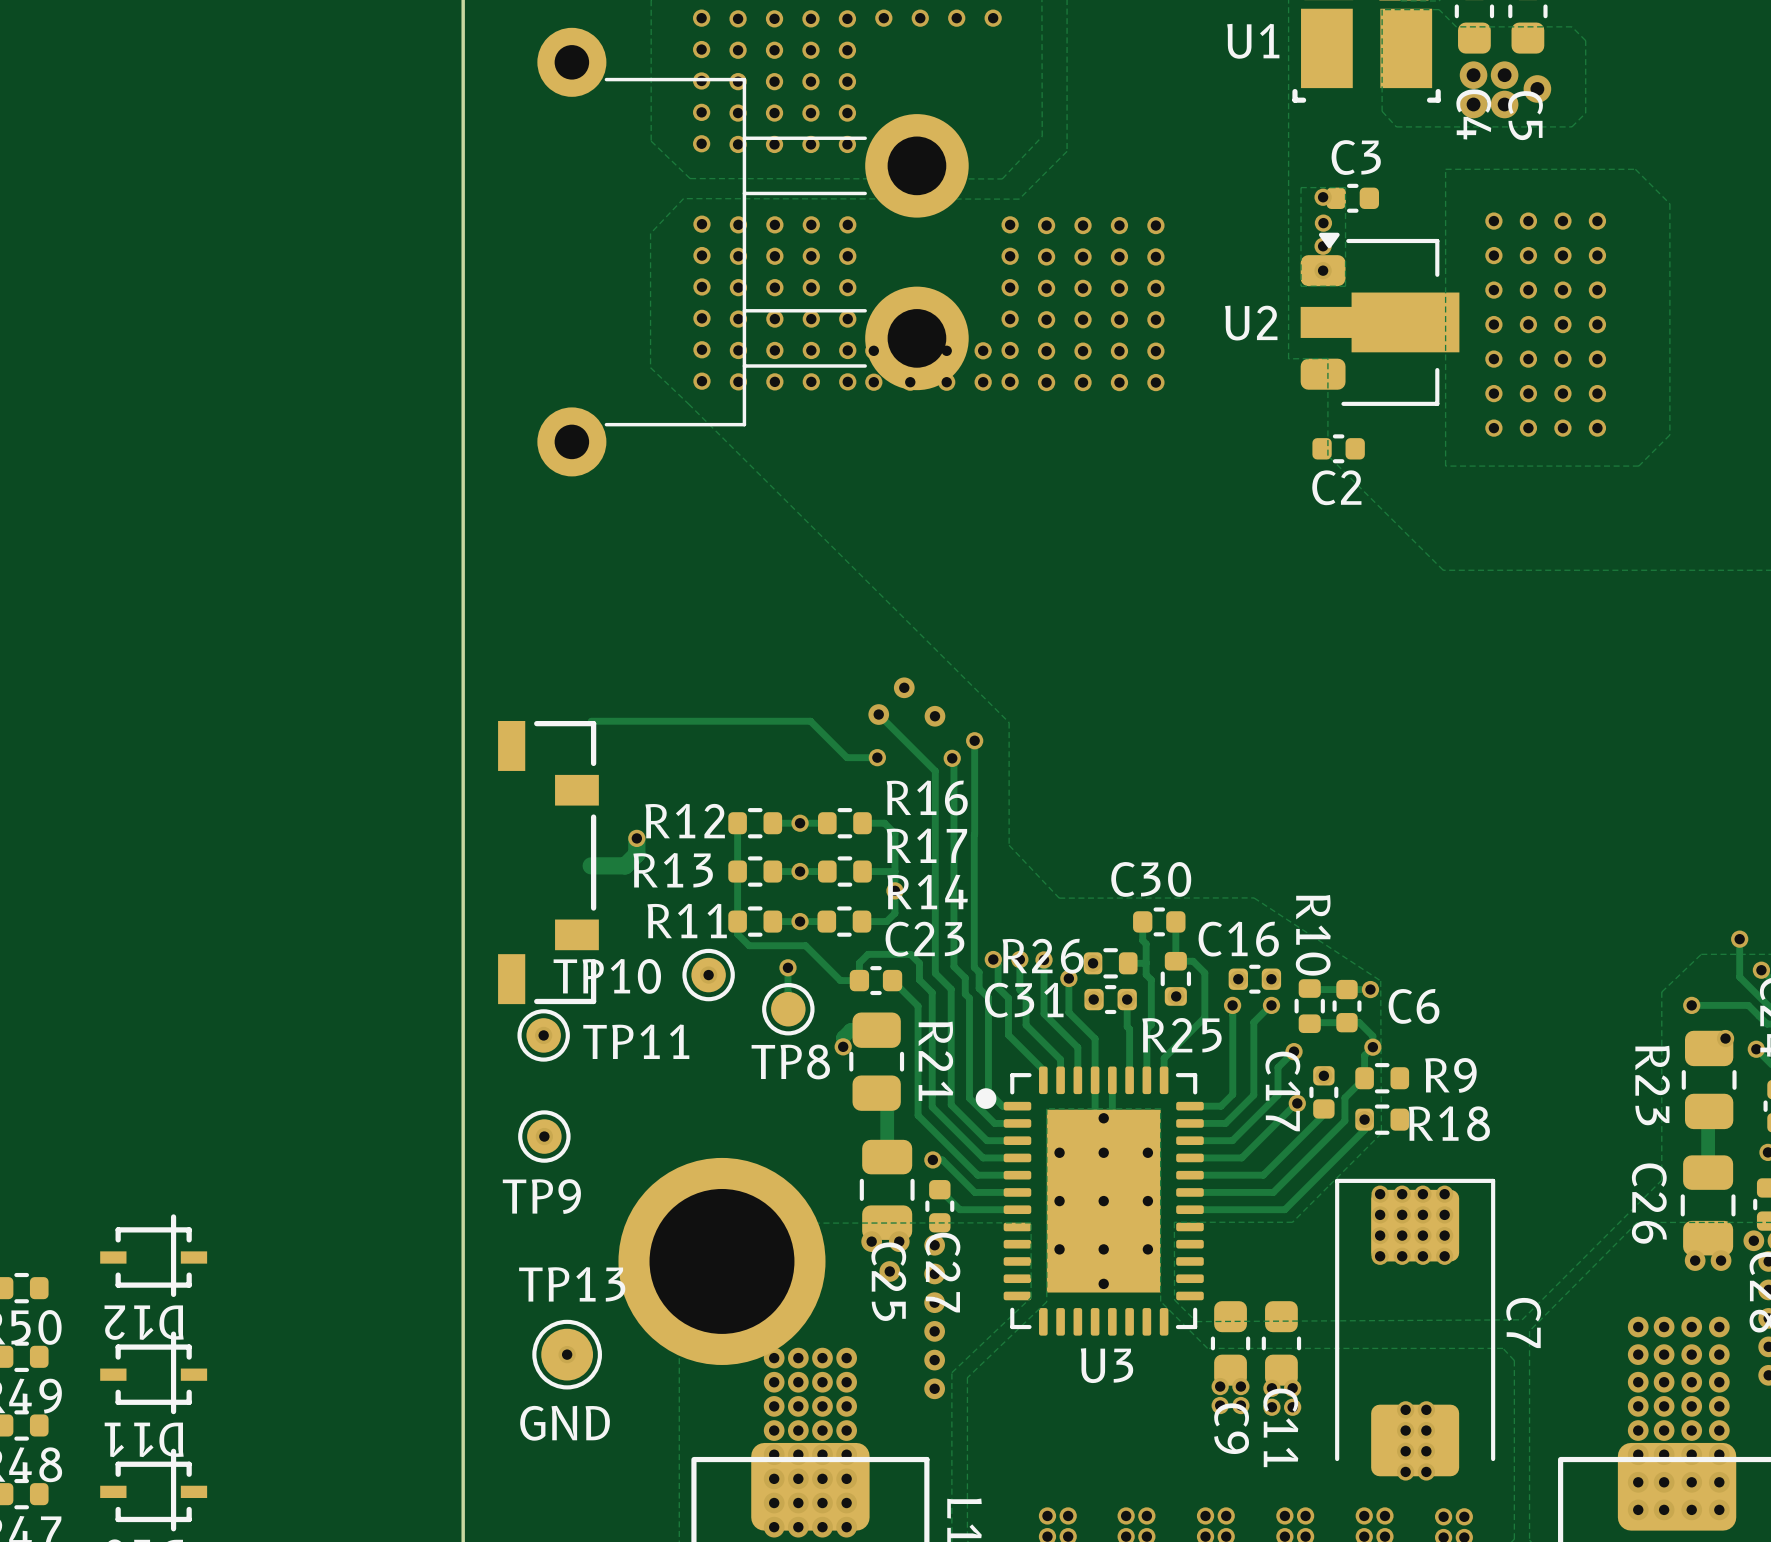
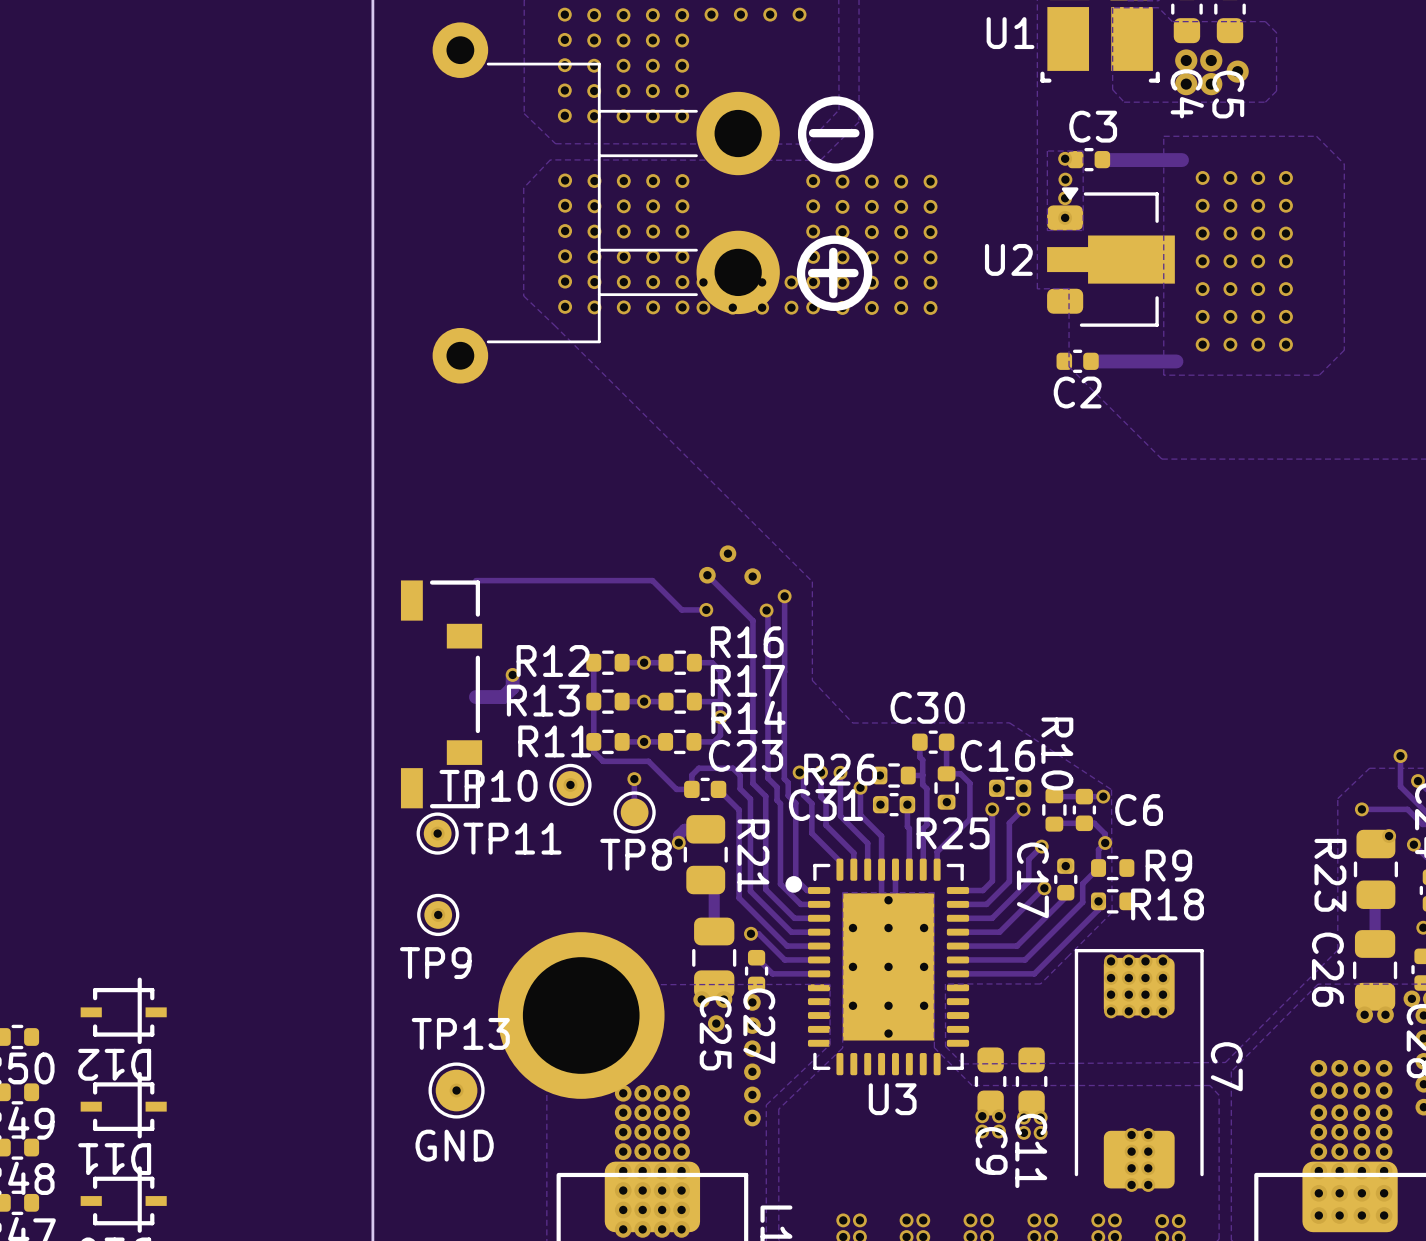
drawing: none -> [797, 96, 874, 172]
text: none -> - (834, 133)
track: none -> (1182, 160) (1102, 160)
drawing: none -> [796, 235, 873, 311]
text: none -> + (833, 273)
track: none -> (1176, 361) (1091, 361)

